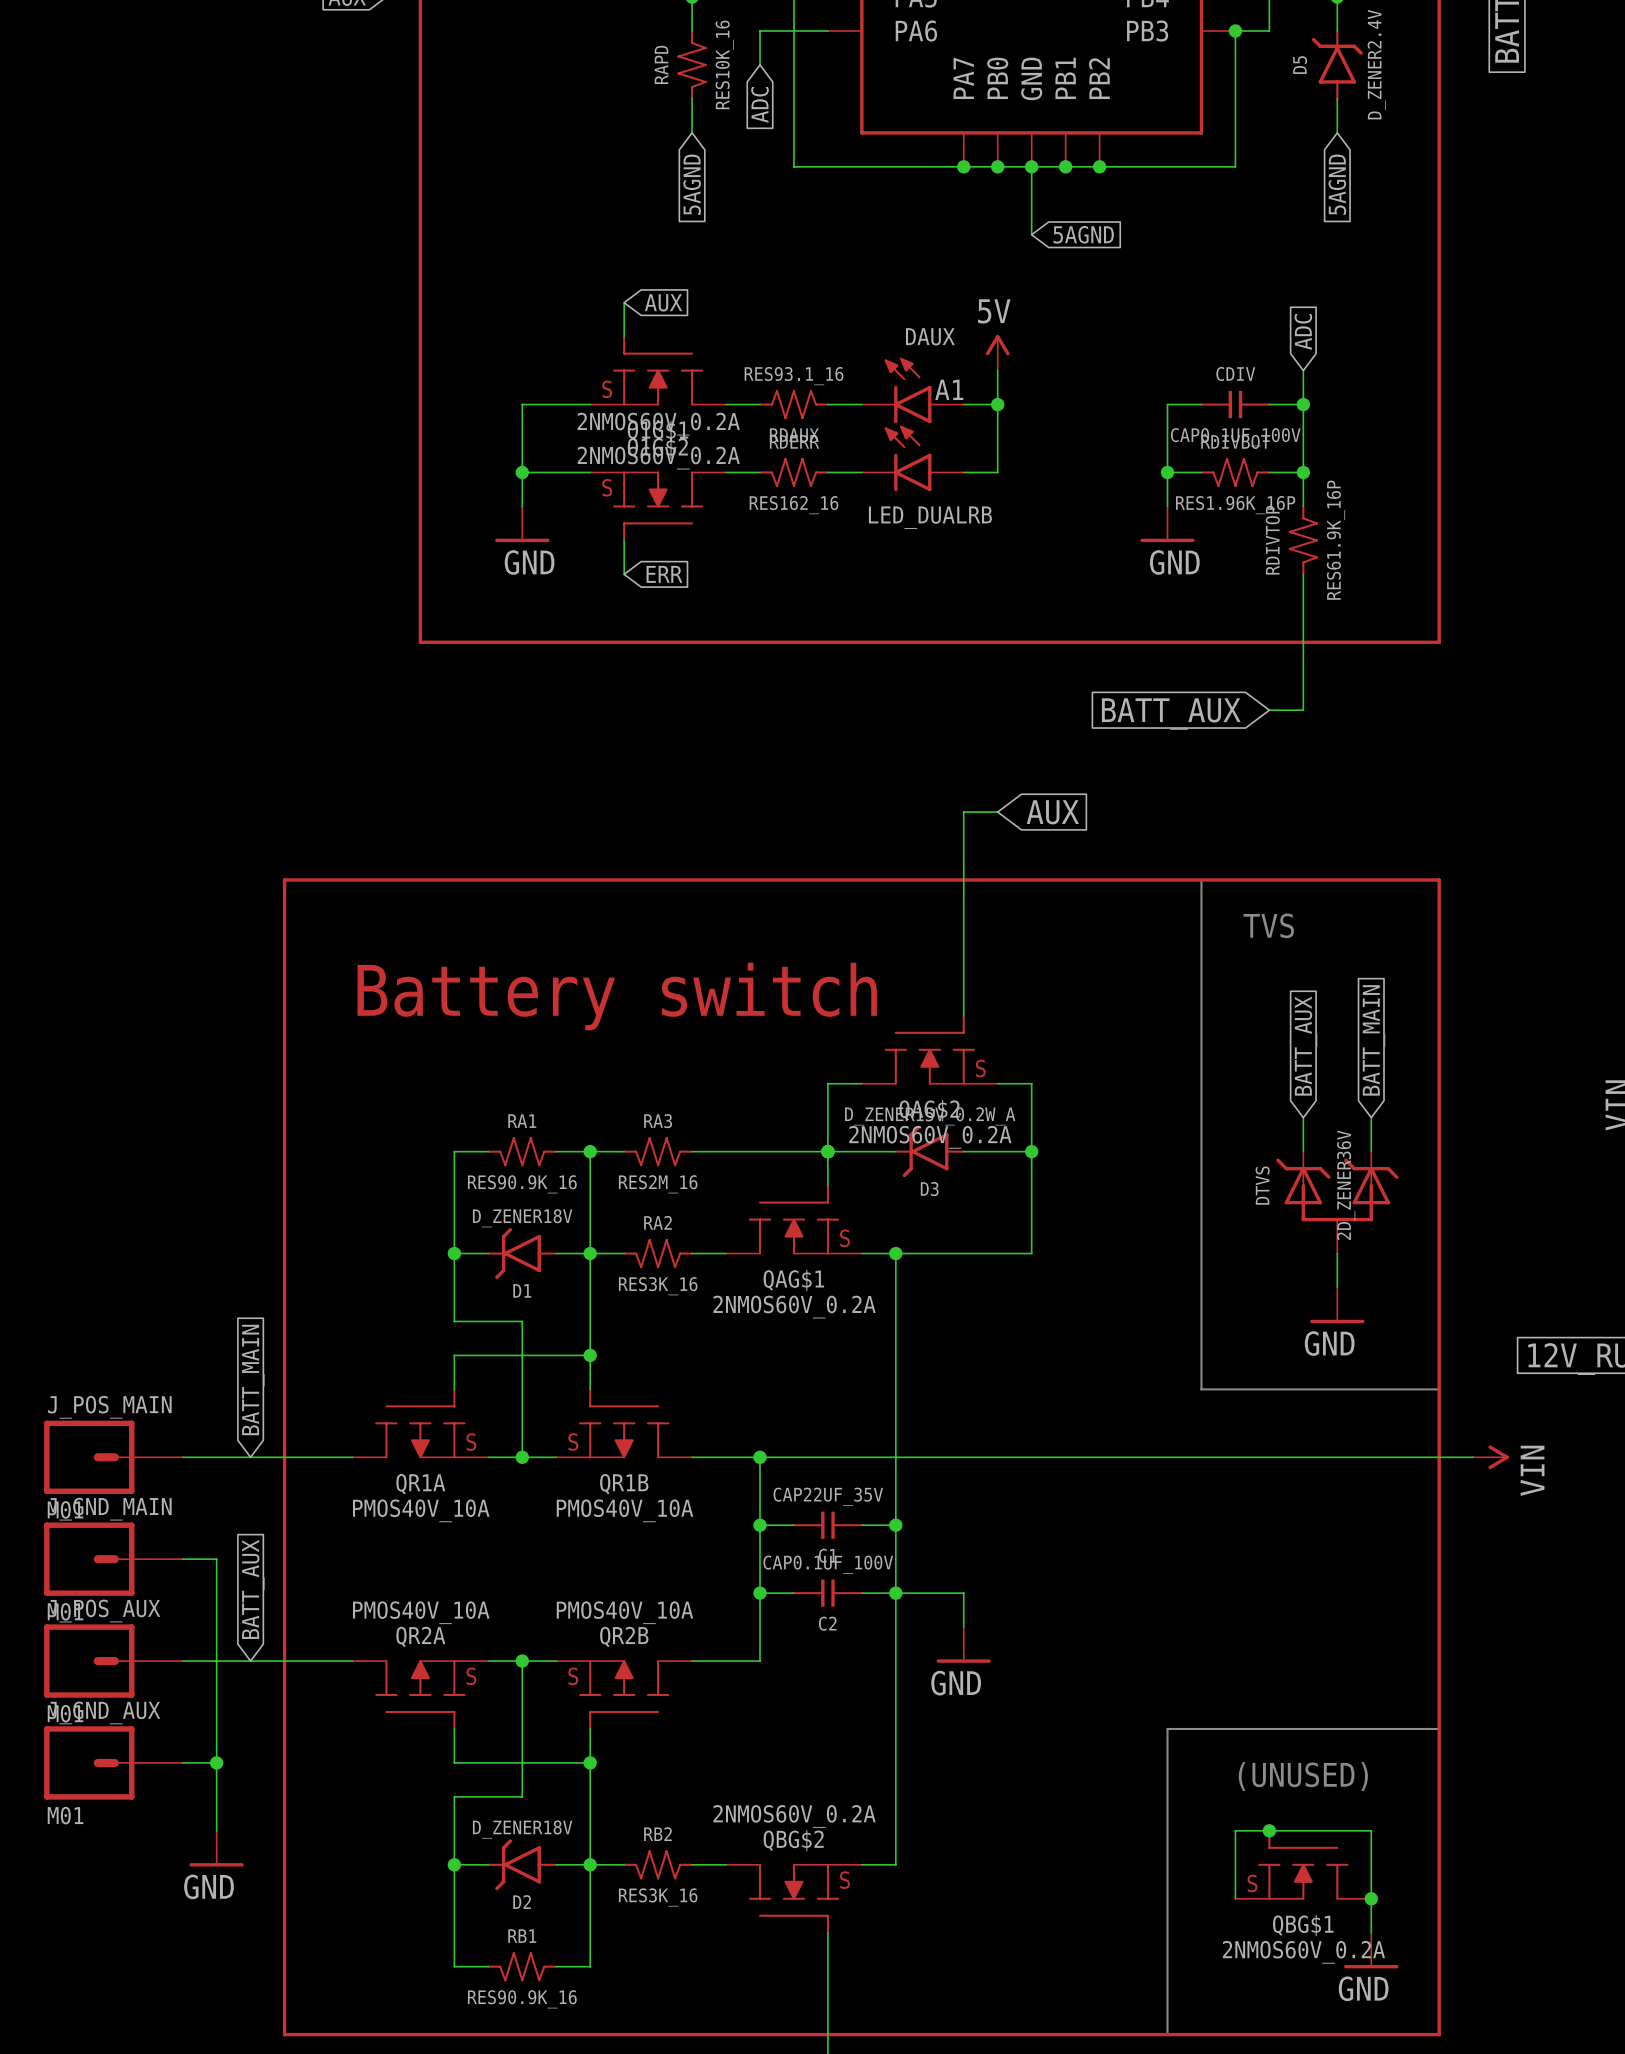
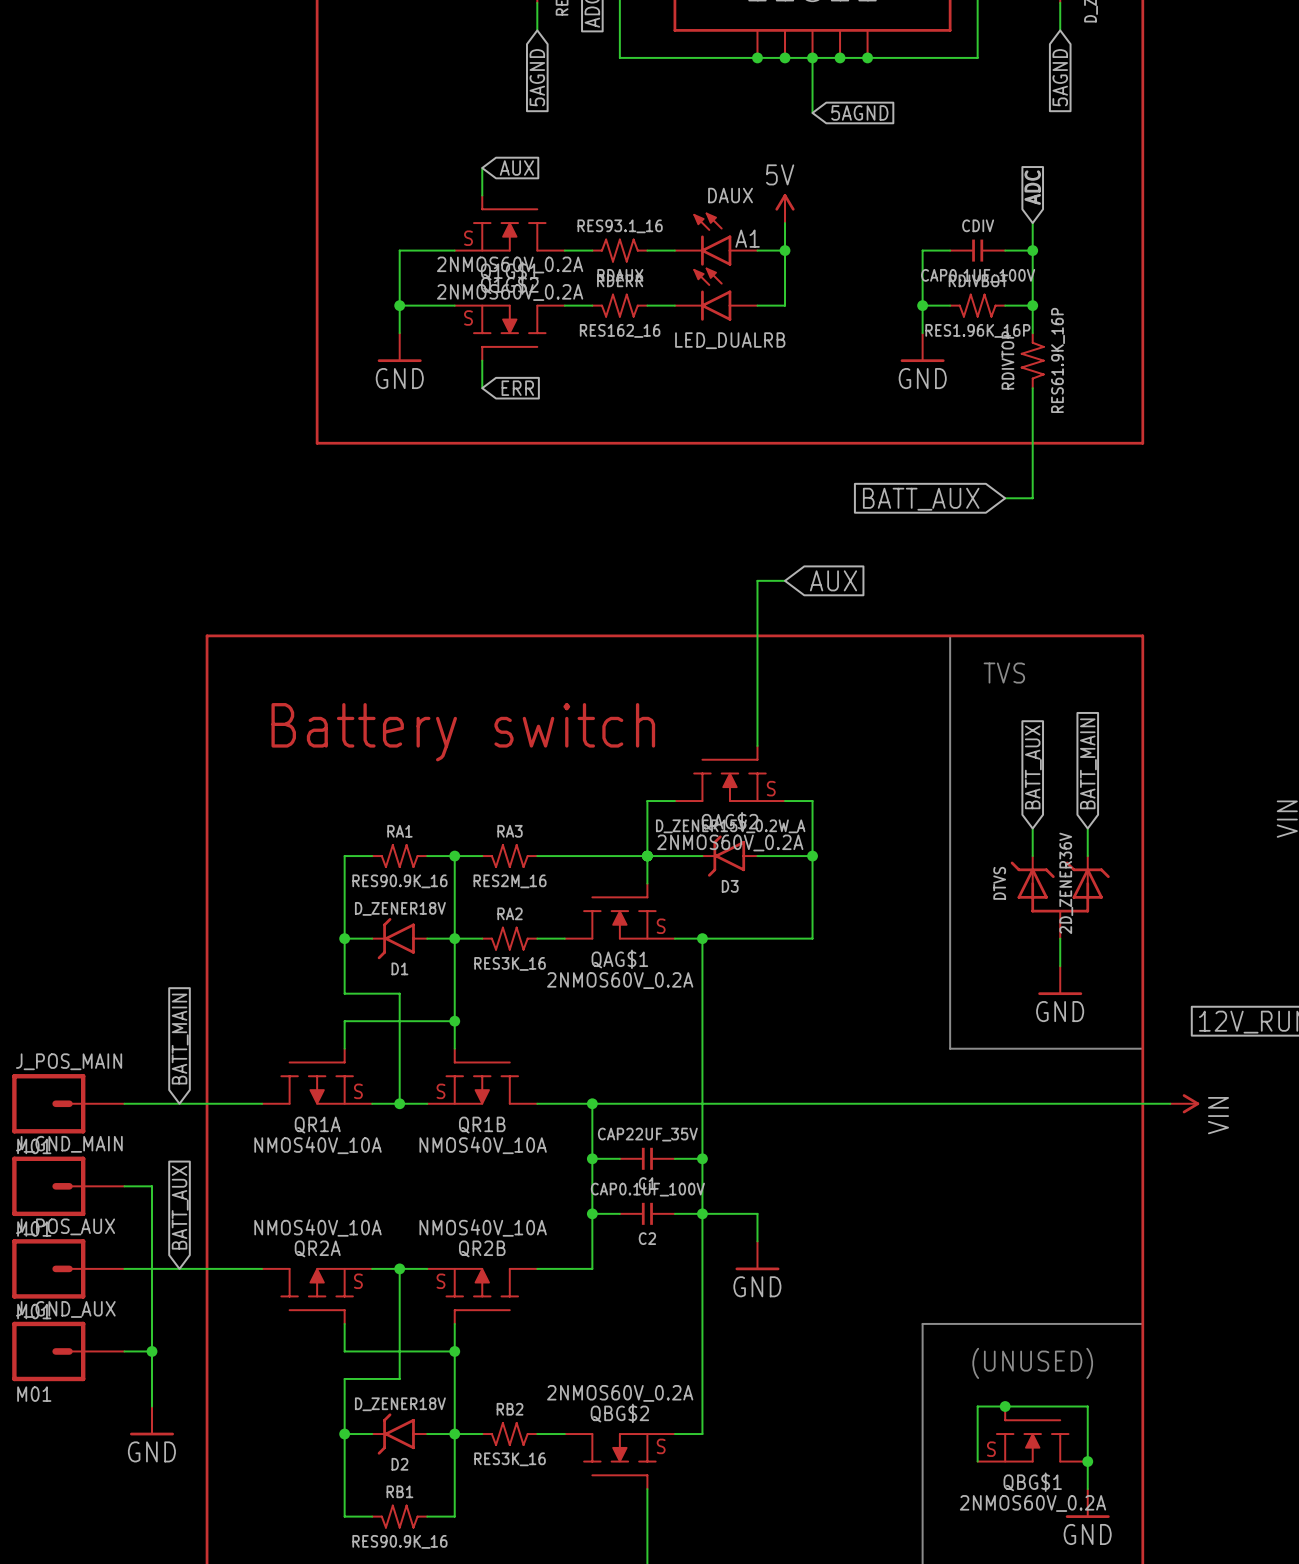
QR1A value: PMOS40V_10A (421, 1510) -> NMOS40V_10A (318, 1145)
QR1B value: PMOS40V_10A (624, 1510) -> NMOS40V_10A (483, 1145)
QR2A value: PMOS40V_10A (421, 1612) -> NMOS40V_10A (318, 1227)
QR2B value: PMOS40V_10A (624, 1612) -> NMOS40V_10A (483, 1227)

